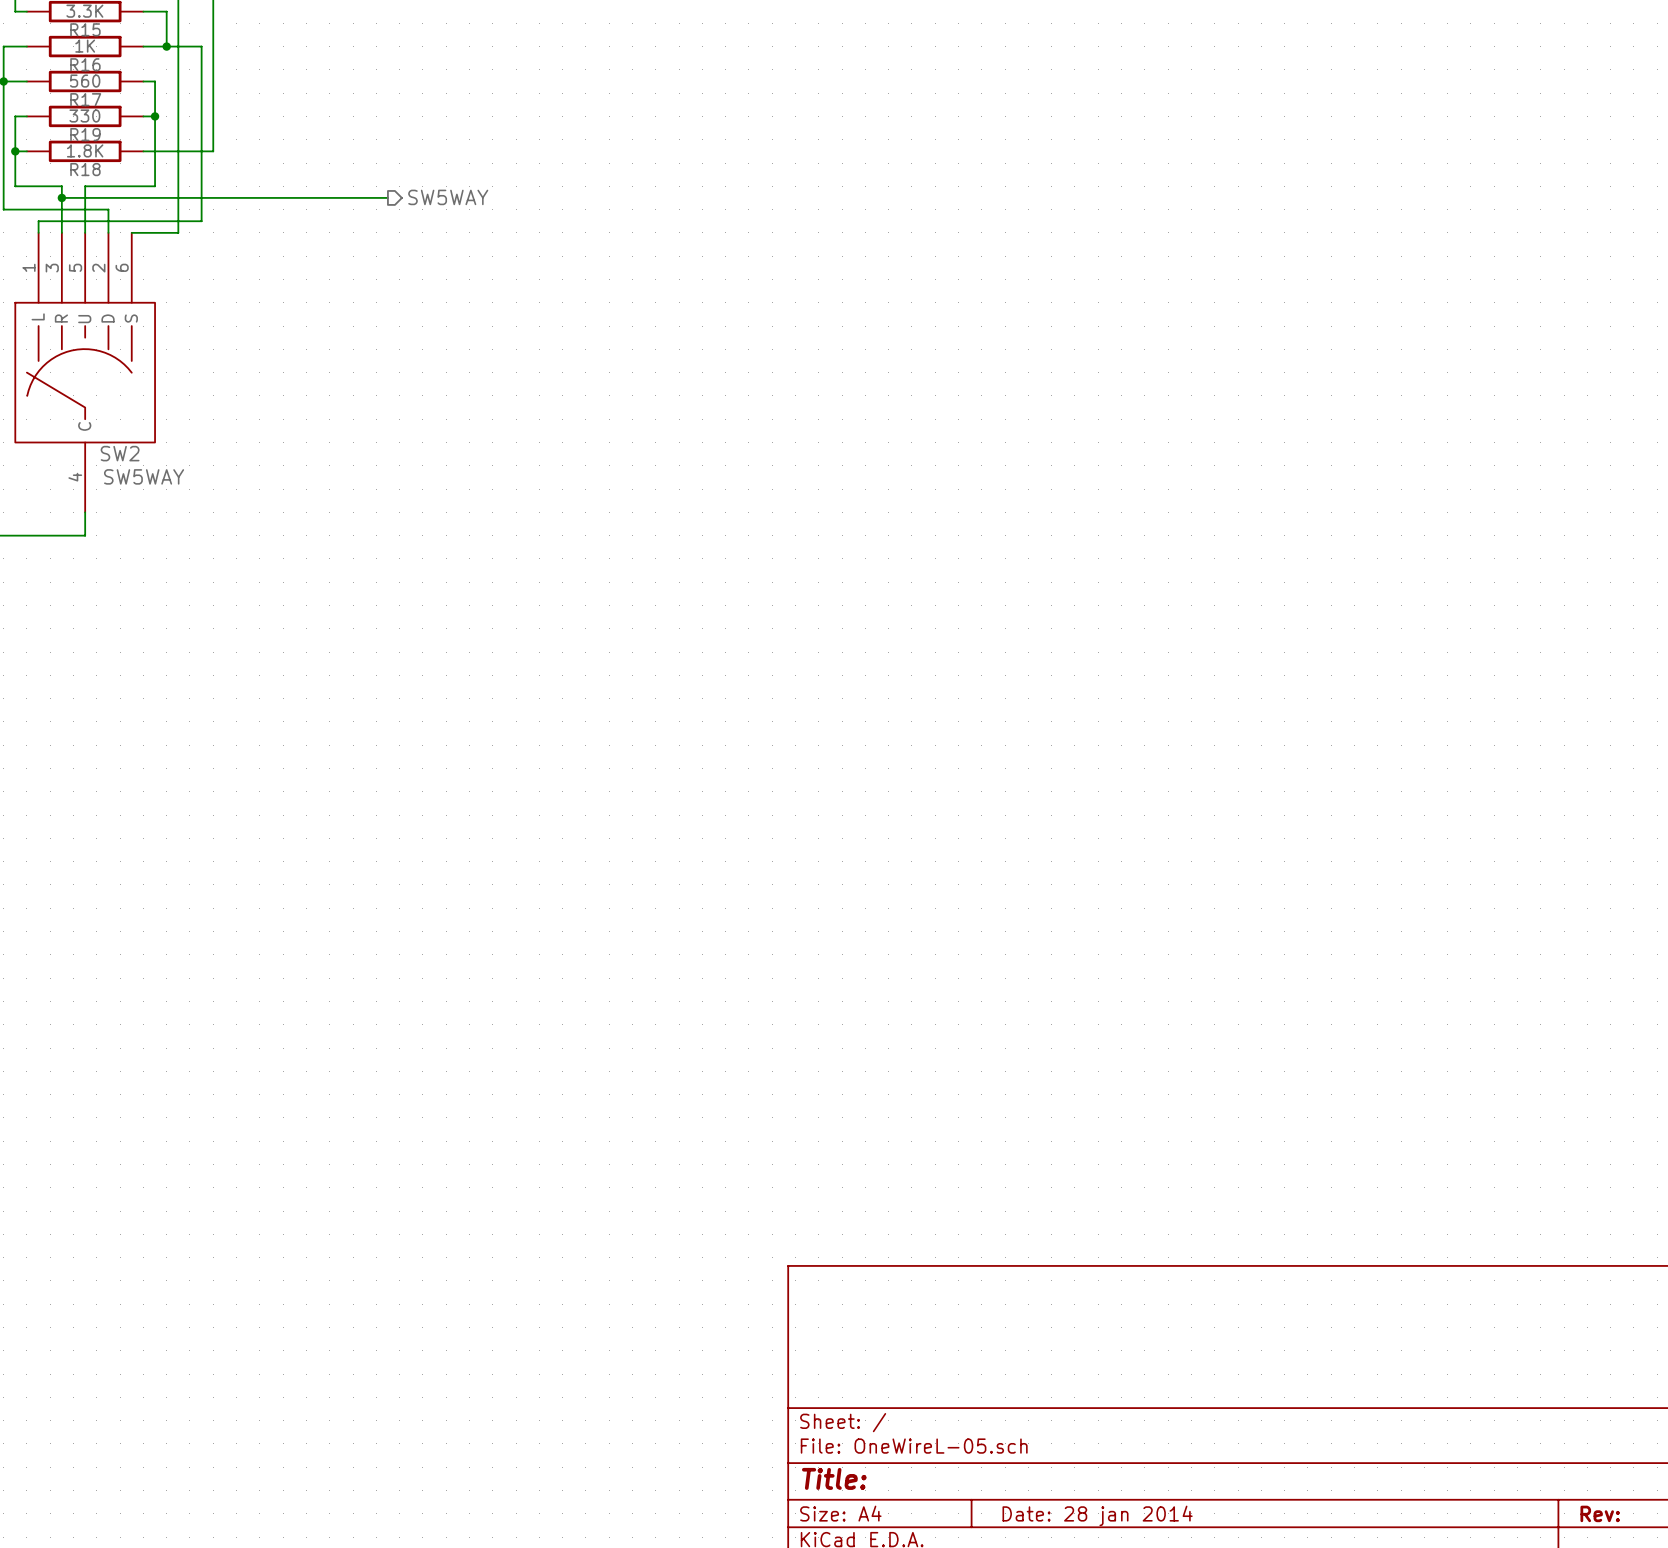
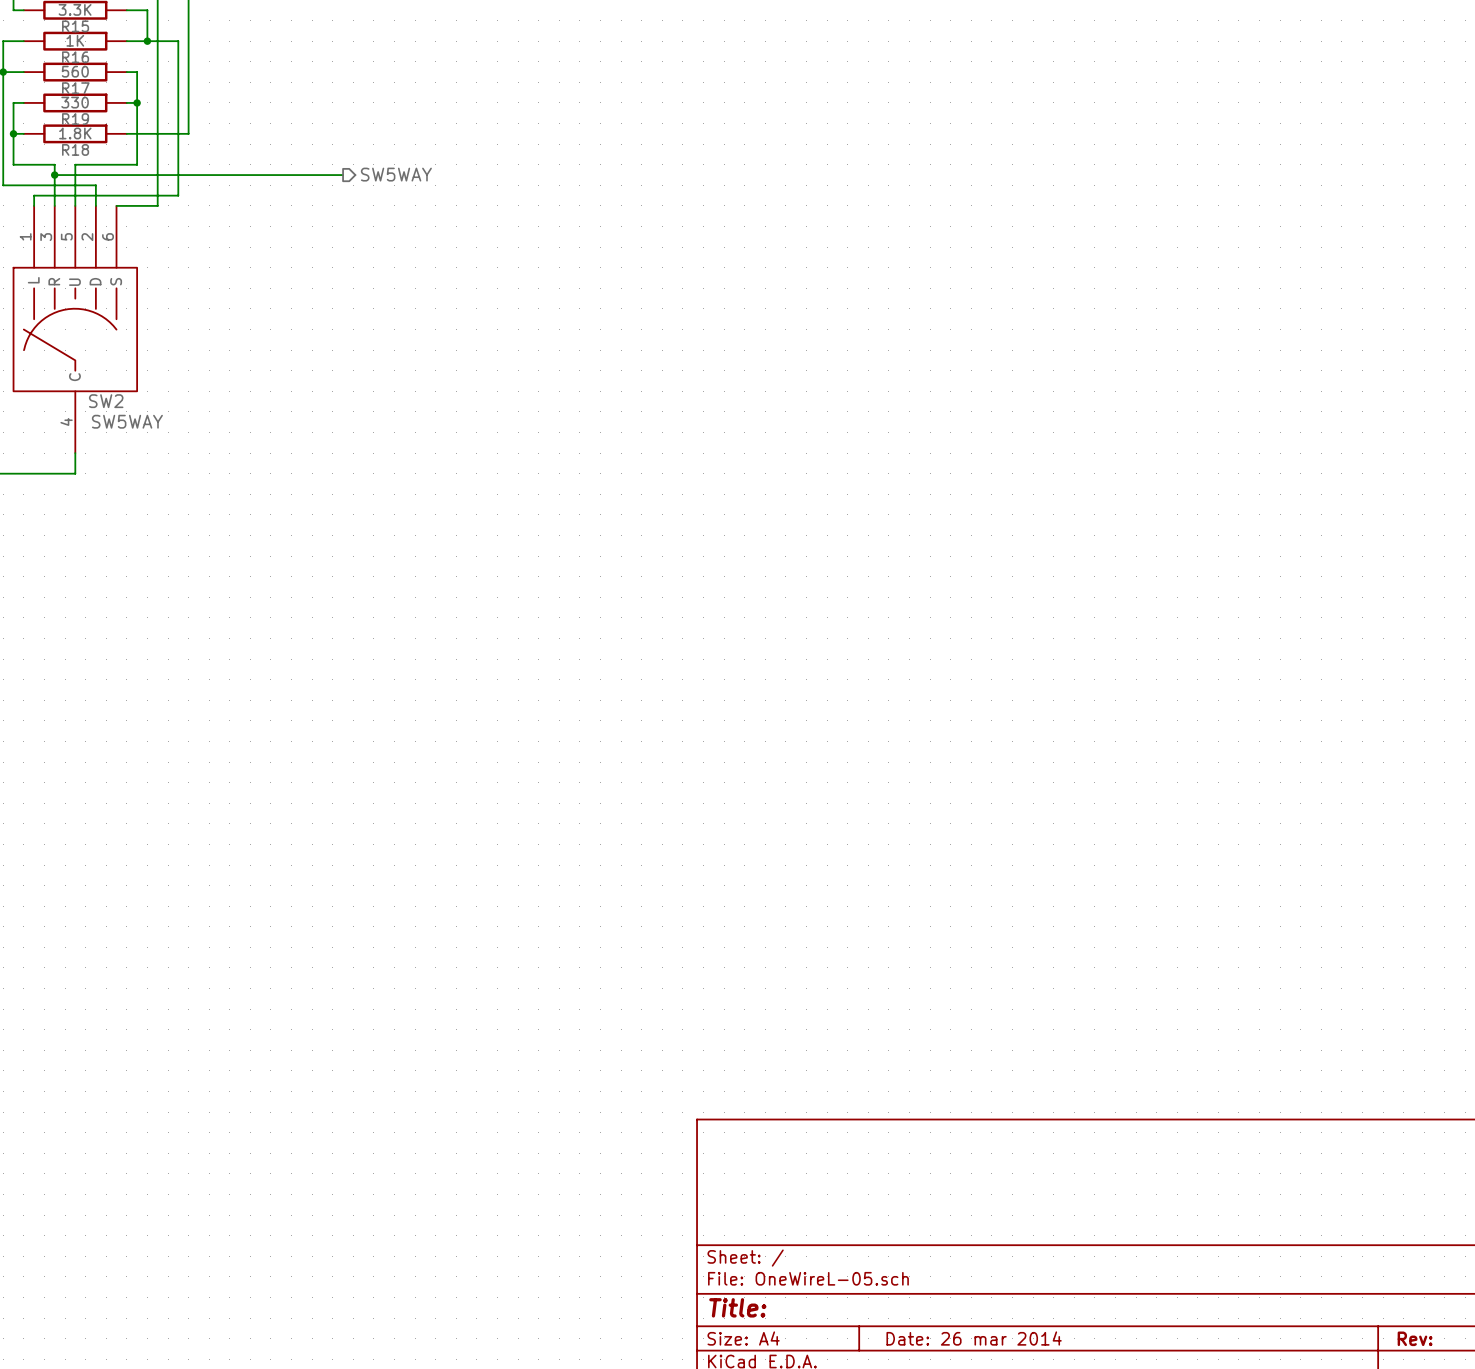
title block: Date: 28 jan 2014 (1097, 1515) -> Date: 26 mar 2014 (974, 1338)

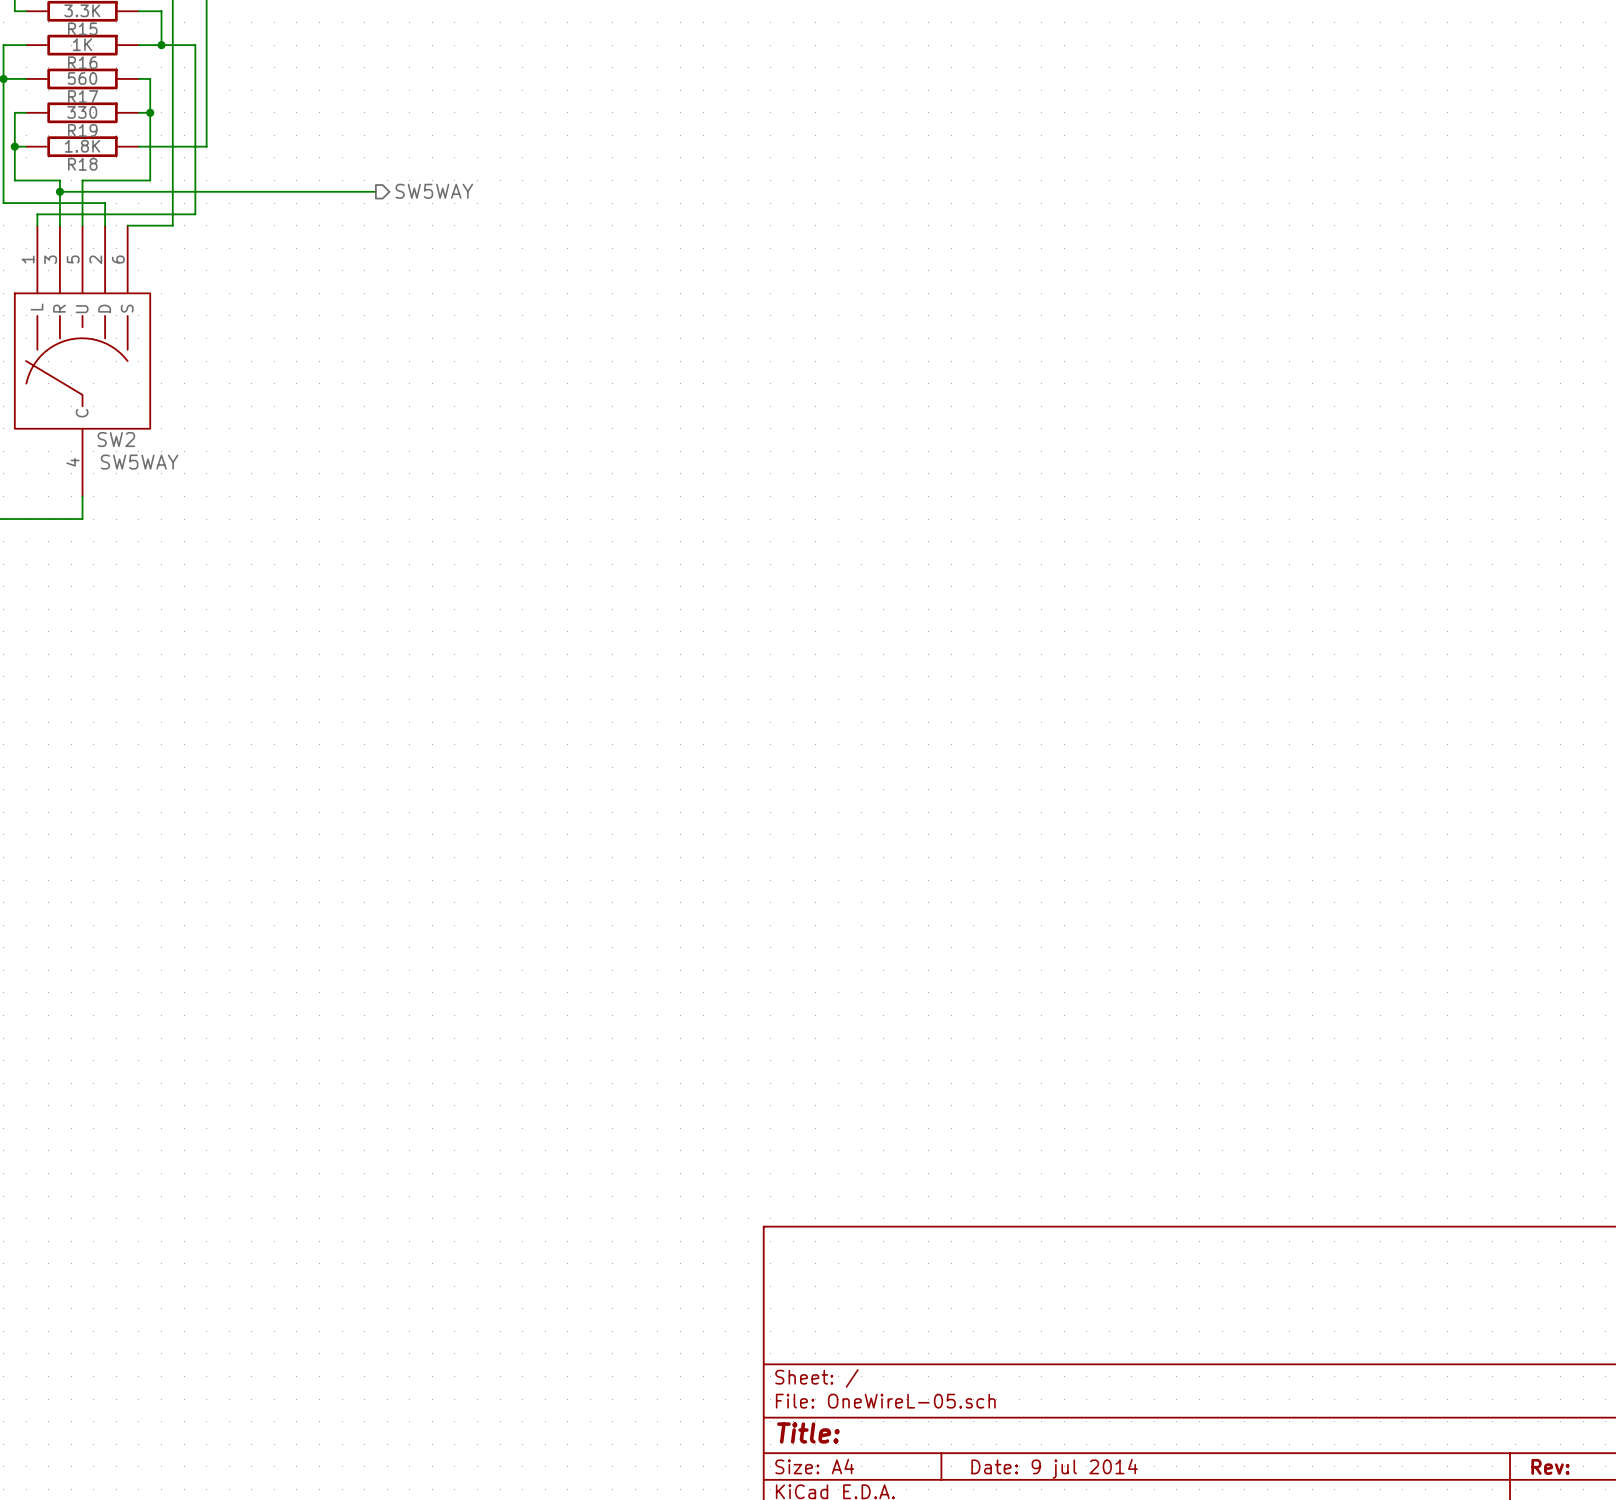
title block: Date: 26 mar 2014 (974, 1338) -> Date: 9 jul 2014 (1054, 1468)

